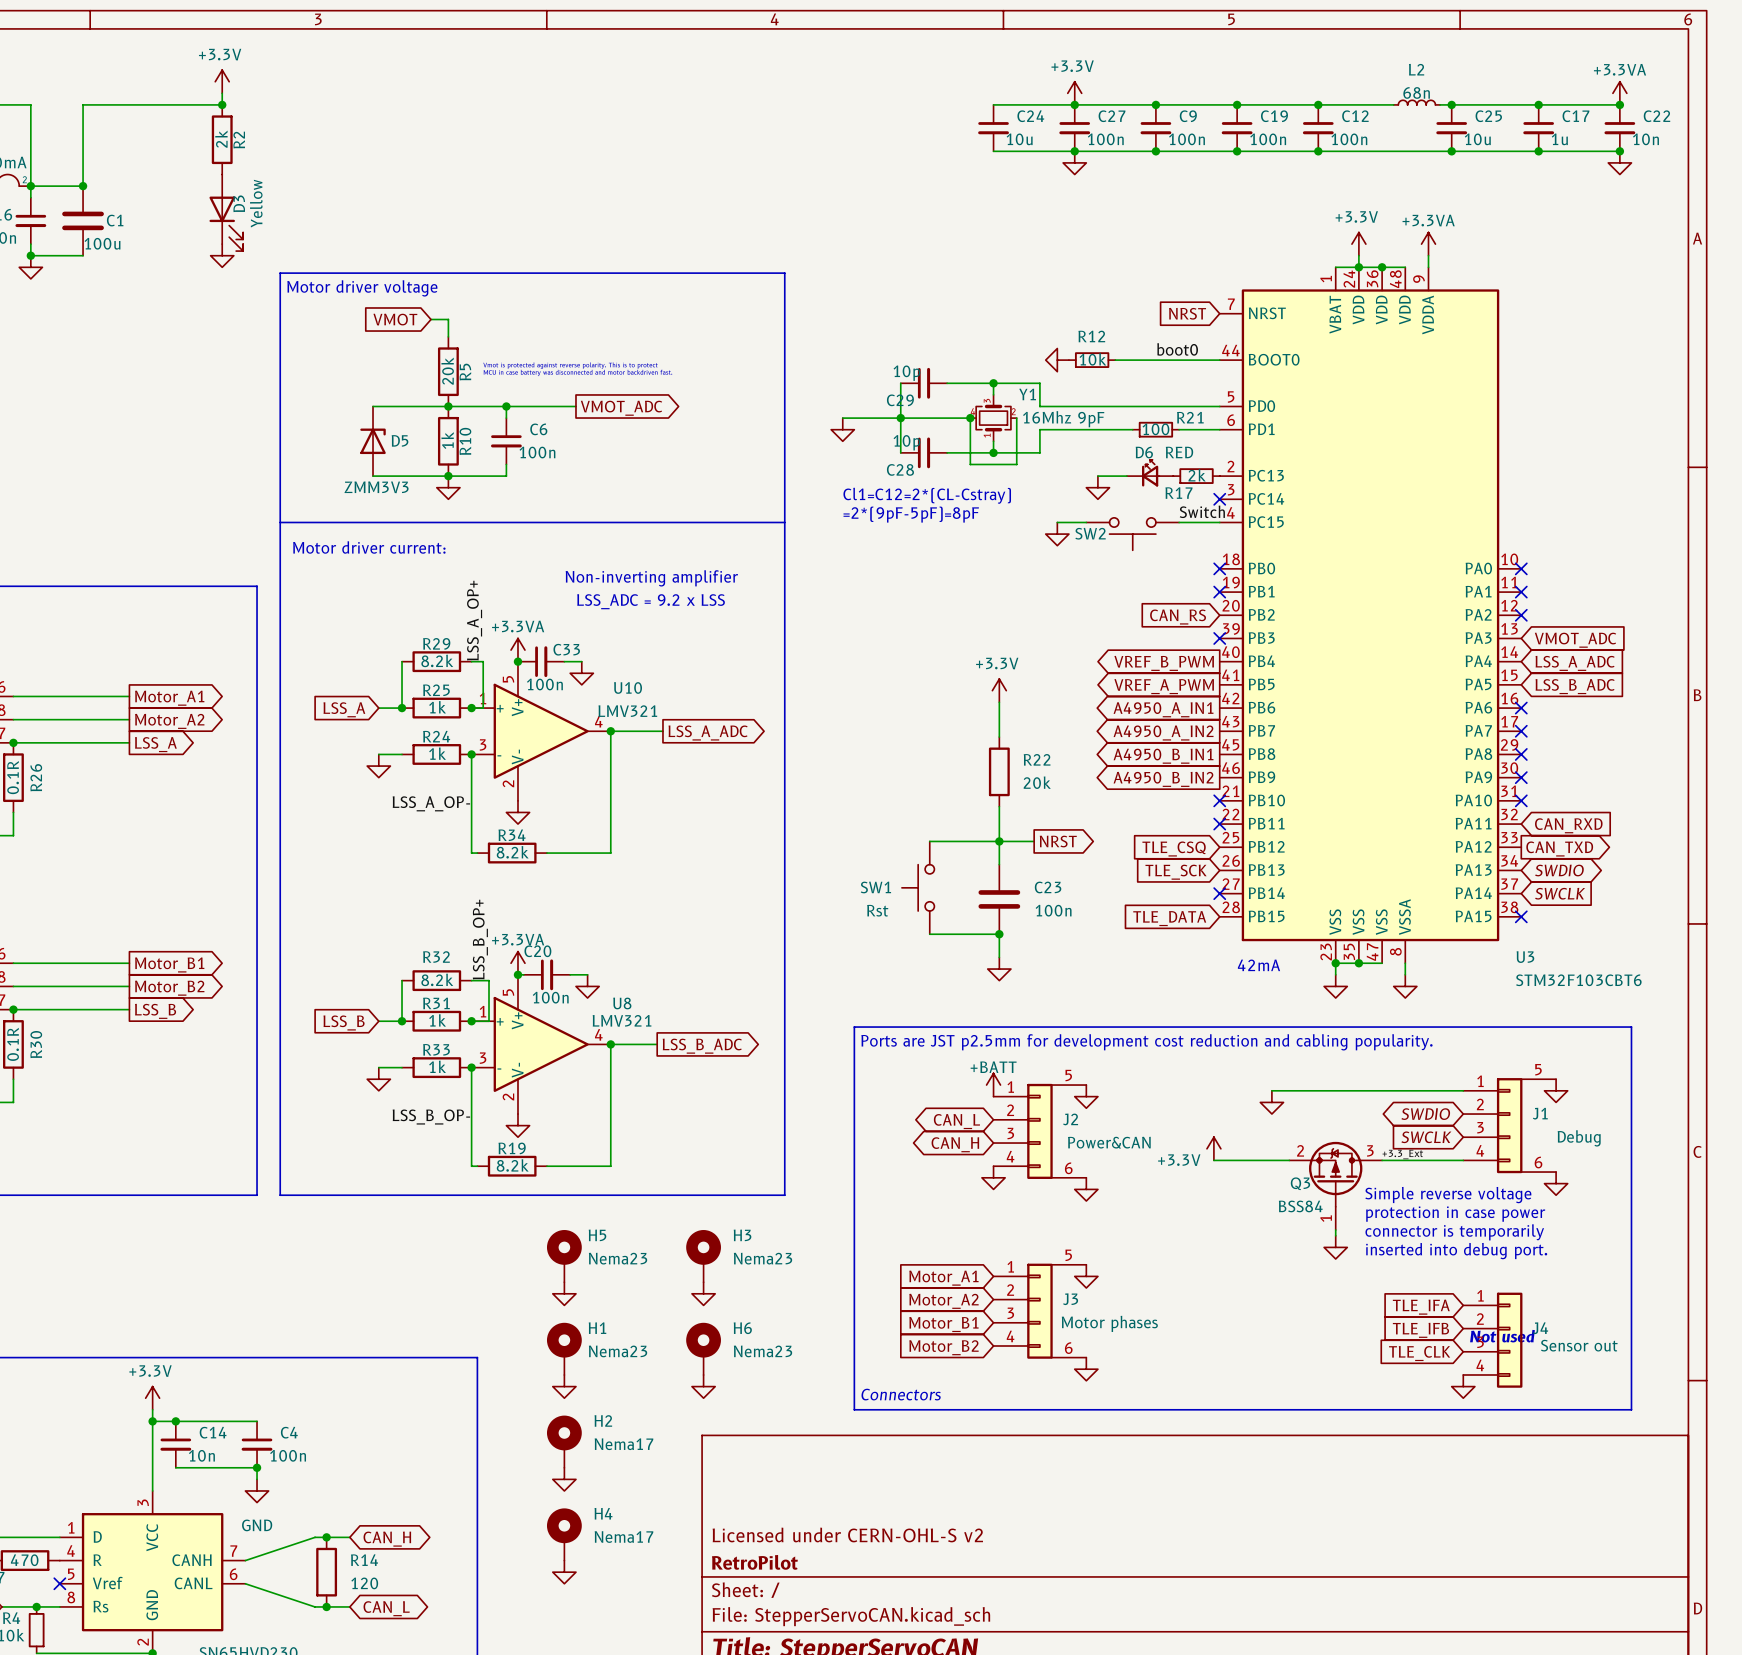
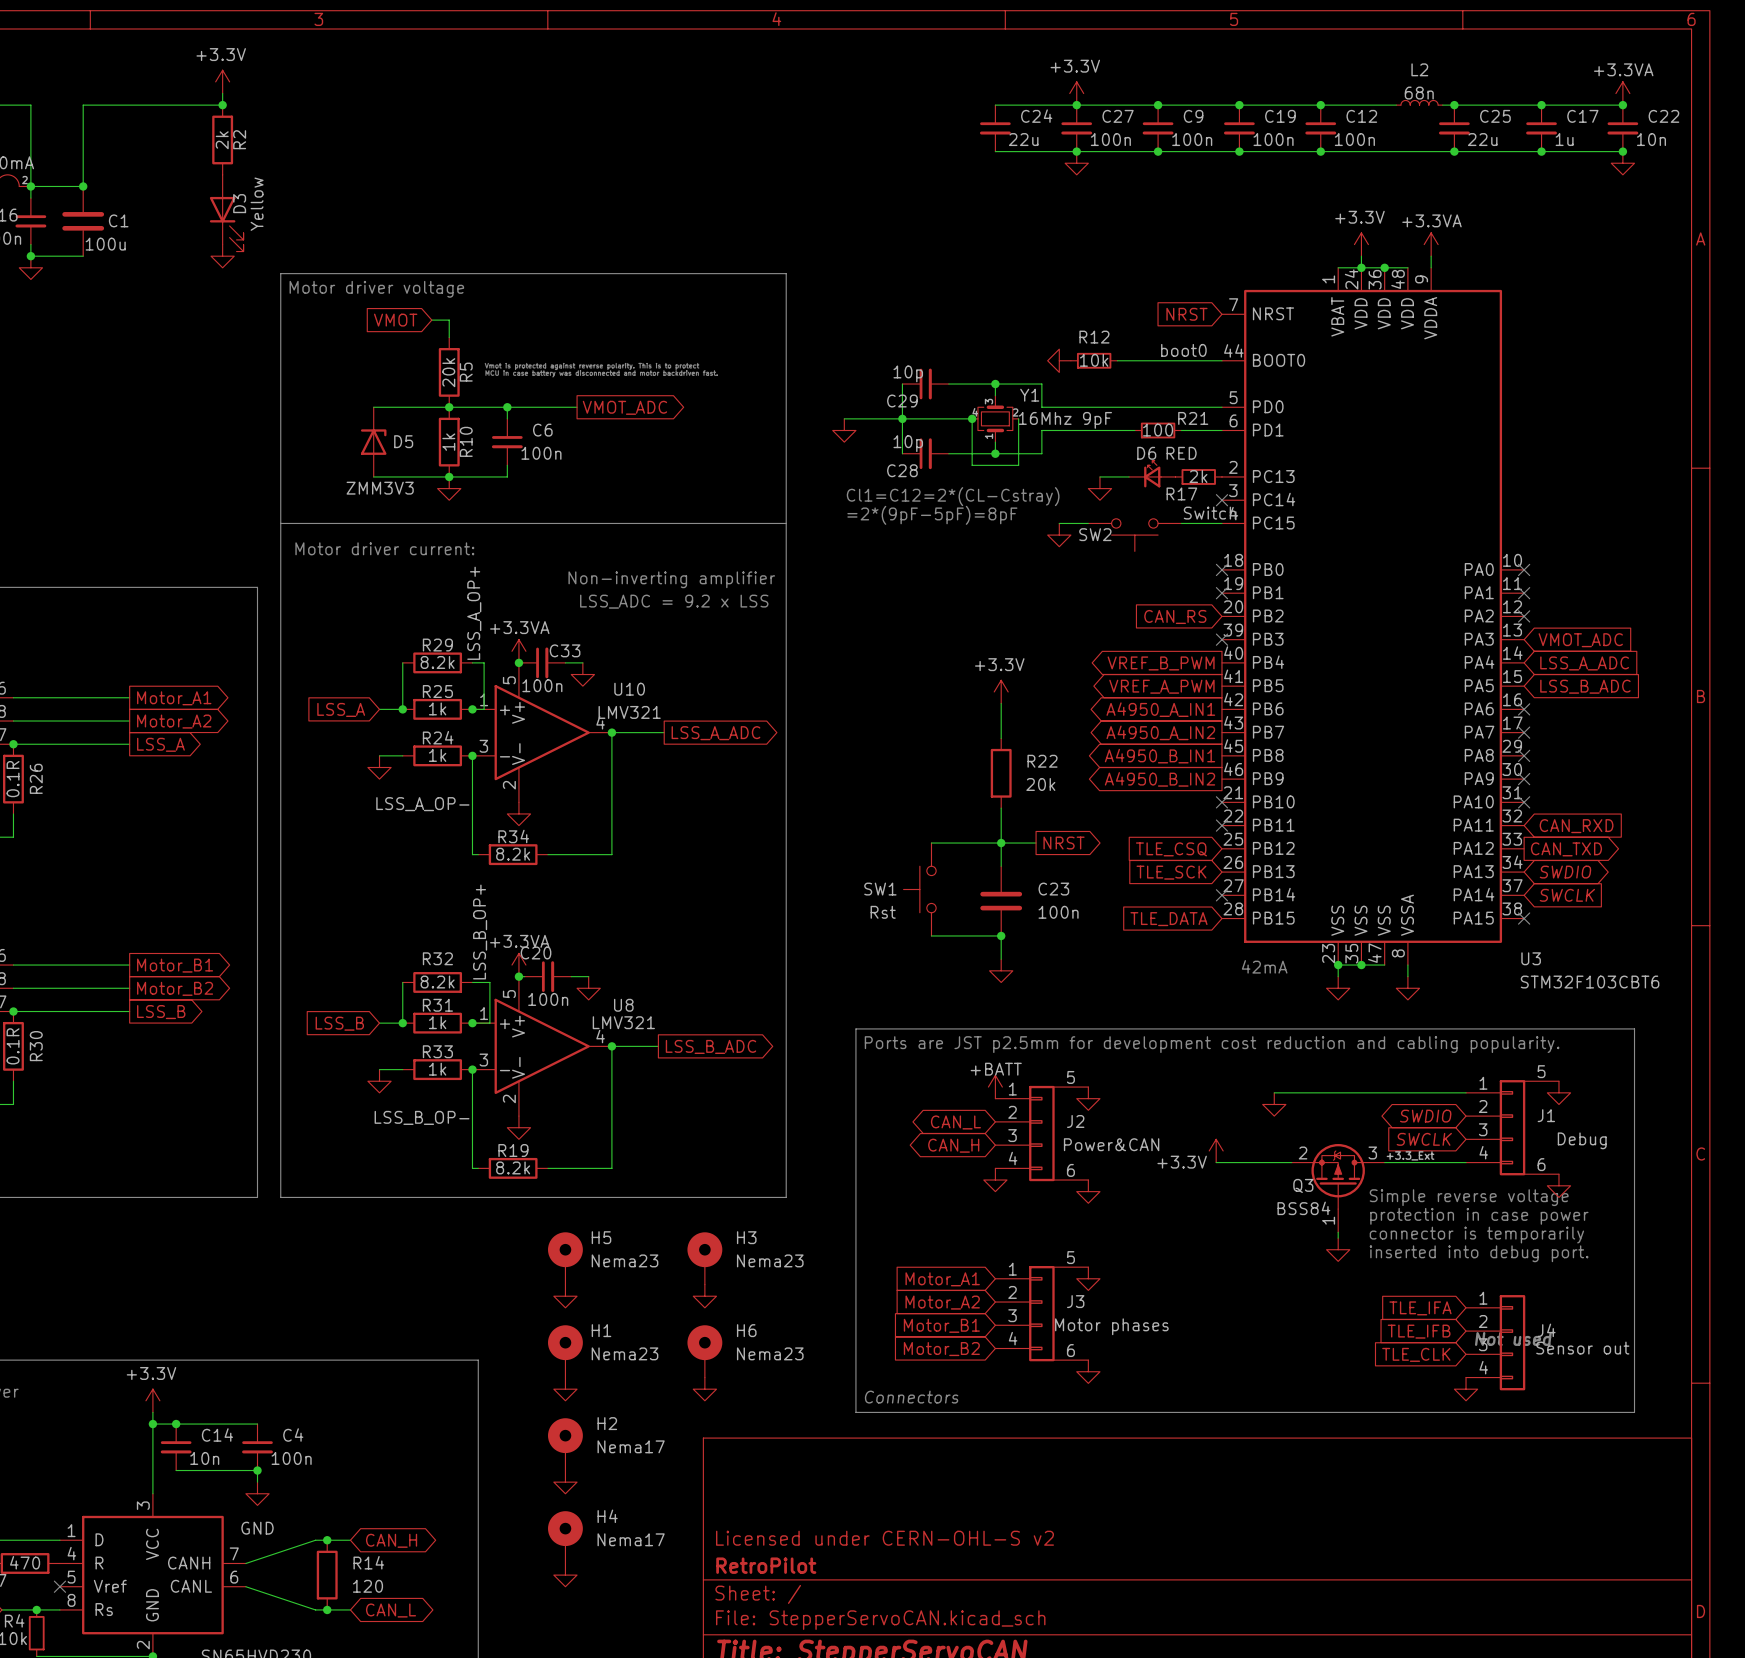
C24 value: 10u (1019, 139) -> 22u (1023, 139)
C25 value: 10u (1477, 139) -> 22u (1482, 139)

